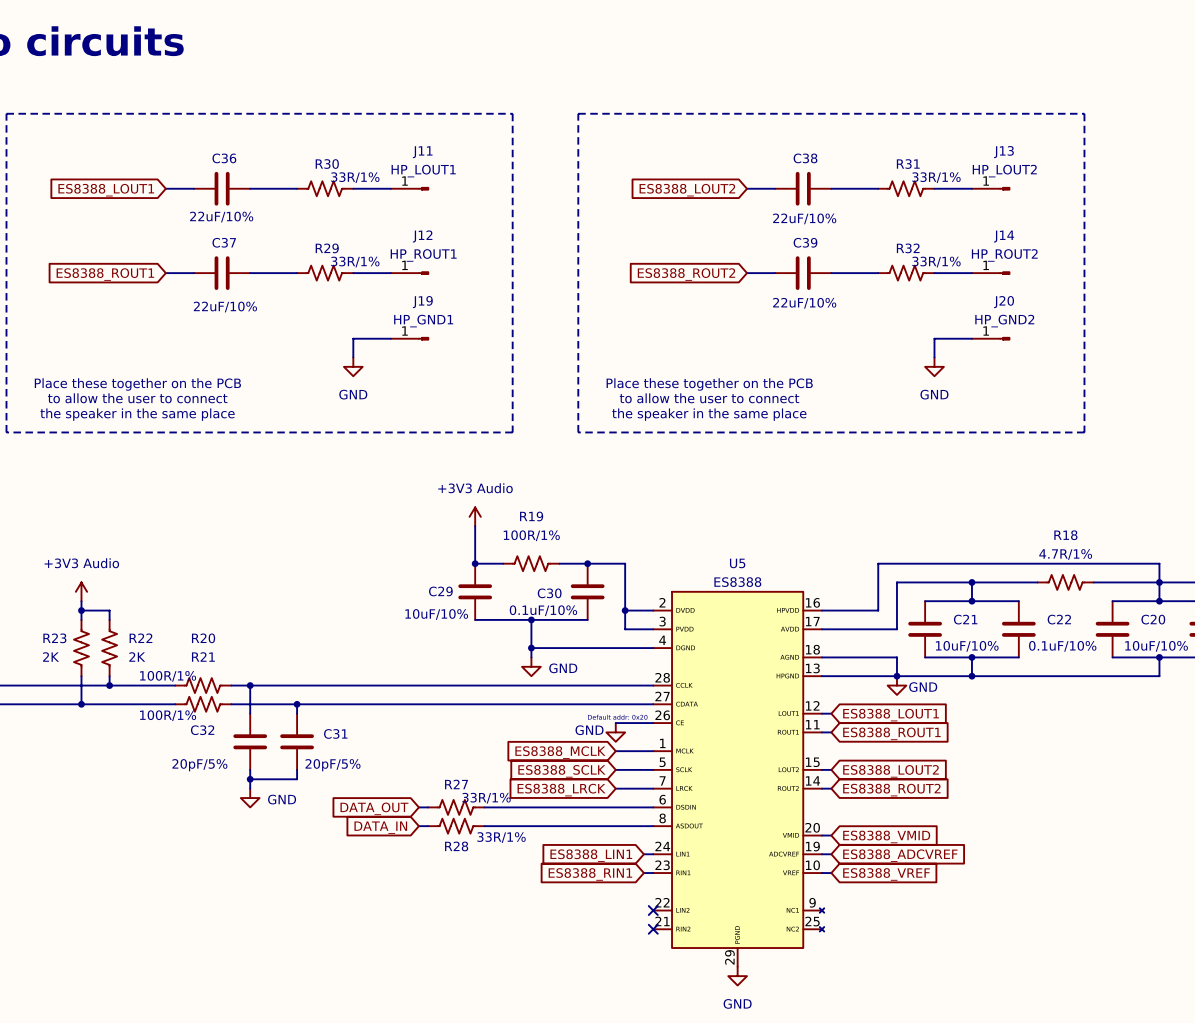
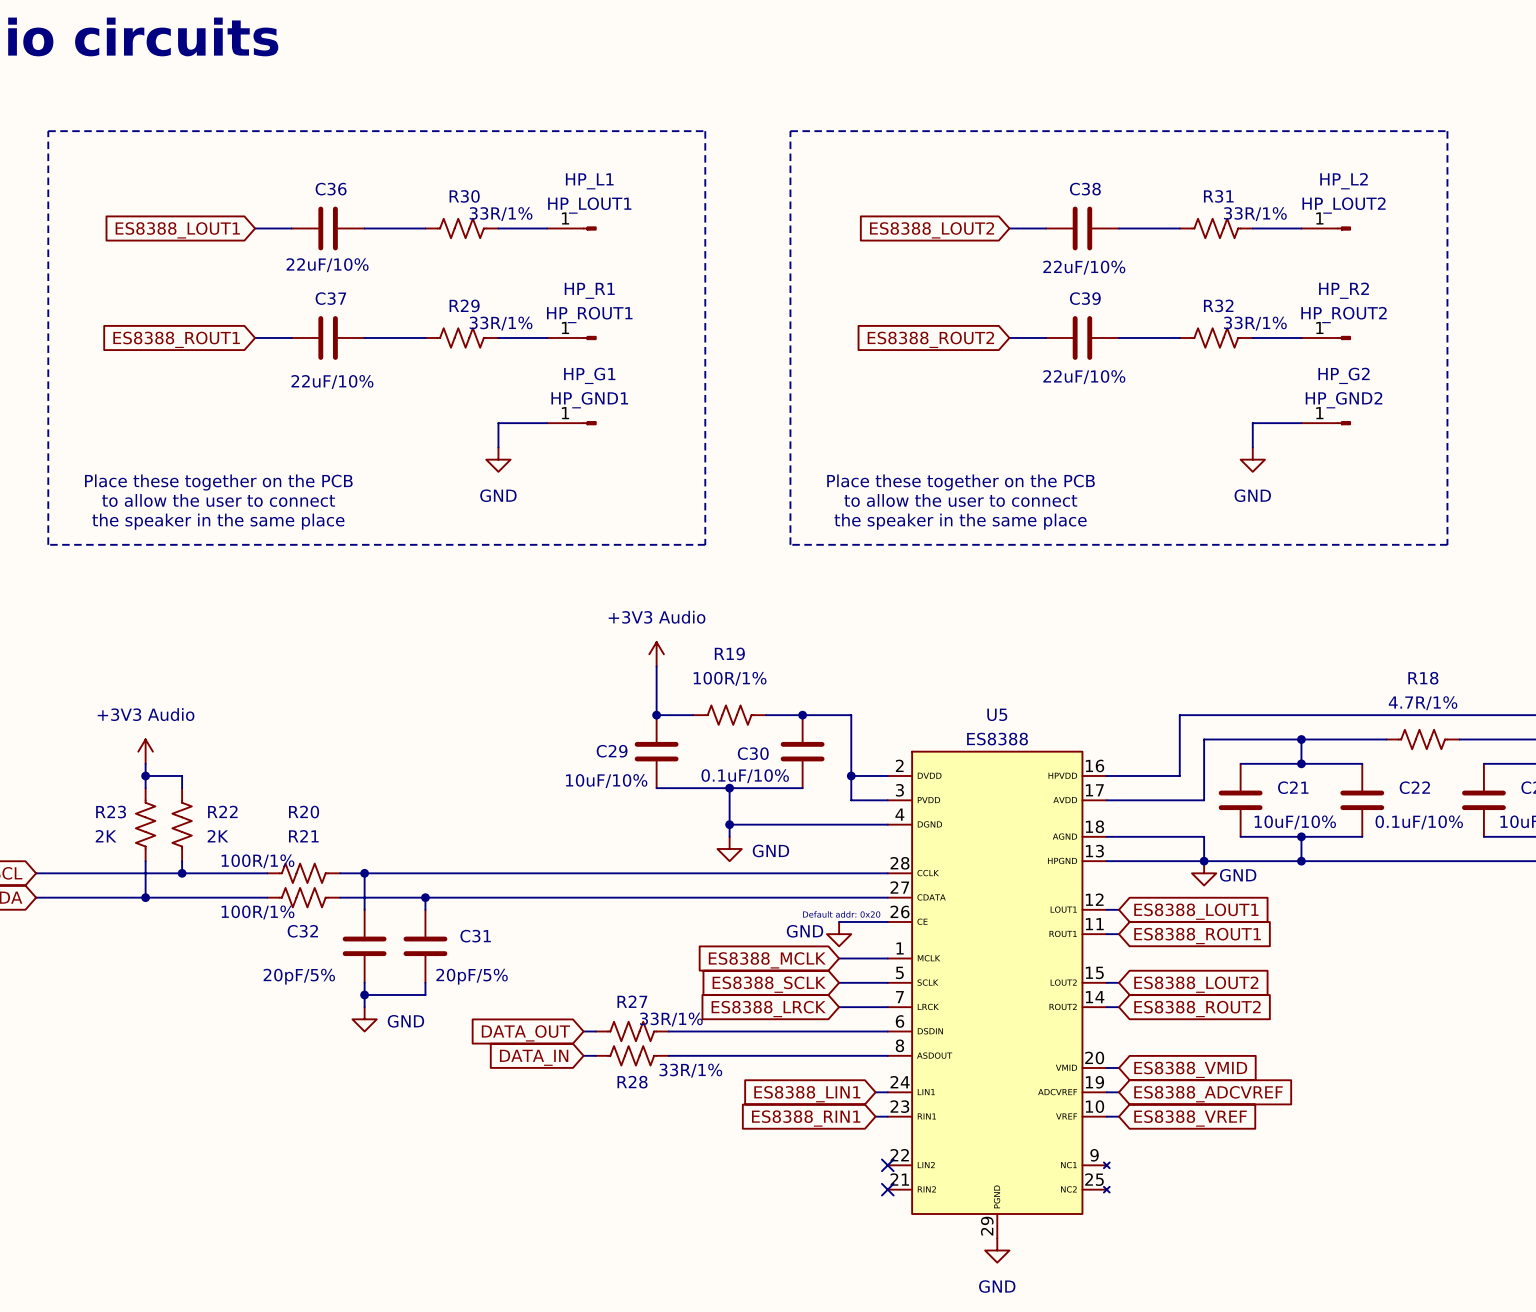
J11 name: J11 (422, 152) -> HP_L1 (589, 181)
J13 name: J13 (1003, 152) -> HP_L2 (1344, 181)
J12 name: J12 (422, 236) -> HP_R1 (589, 290)
J14 name: J14 (1004, 236) -> HP_R2 (1344, 290)
J19 name: J19 (422, 302) -> HP_G1 (589, 375)
J20 name: J20 (1004, 302) -> HP_G2 (1344, 375)

